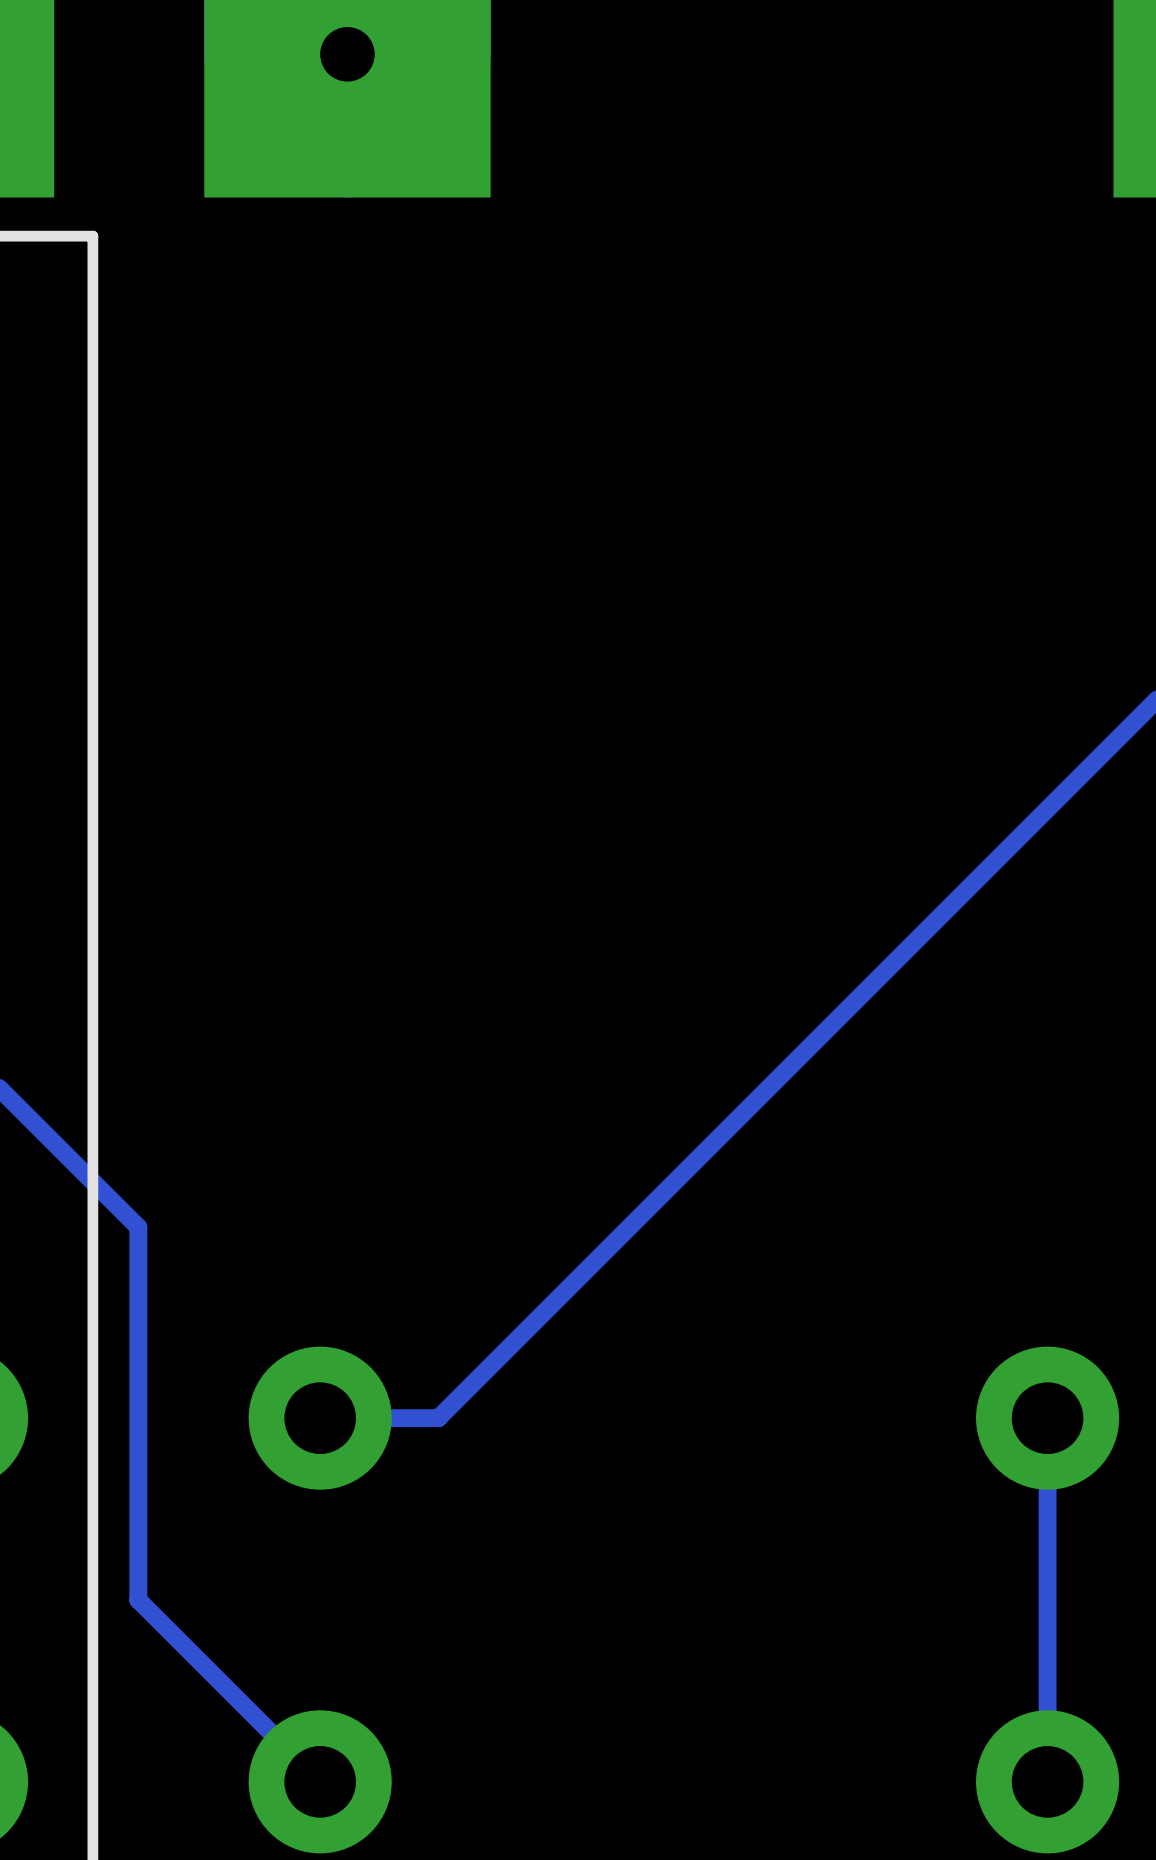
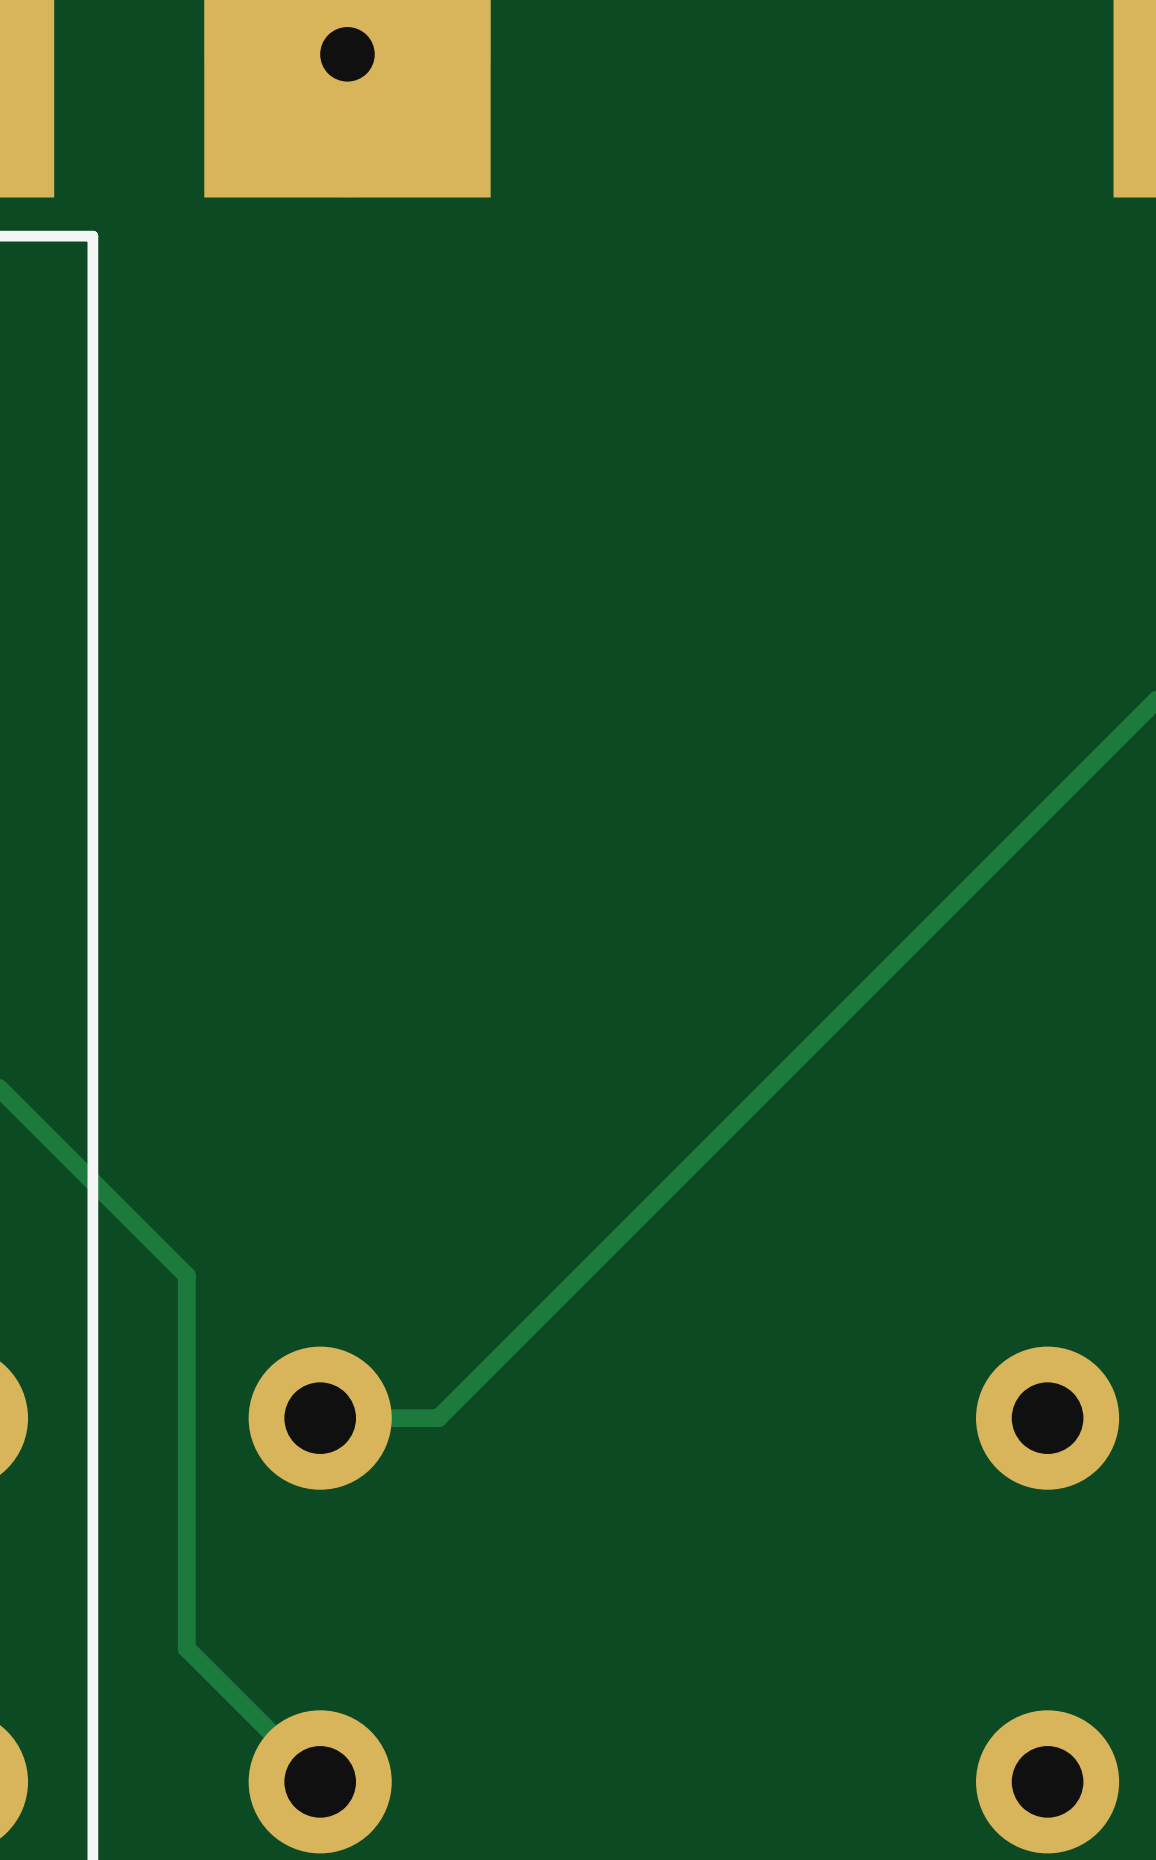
track: (138, 1227) (138, 1600) (186, 1648) -> (138, 1227) (186, 1275) (186, 1648)
track: (1047, 1418) (1047, 1781) -> none

